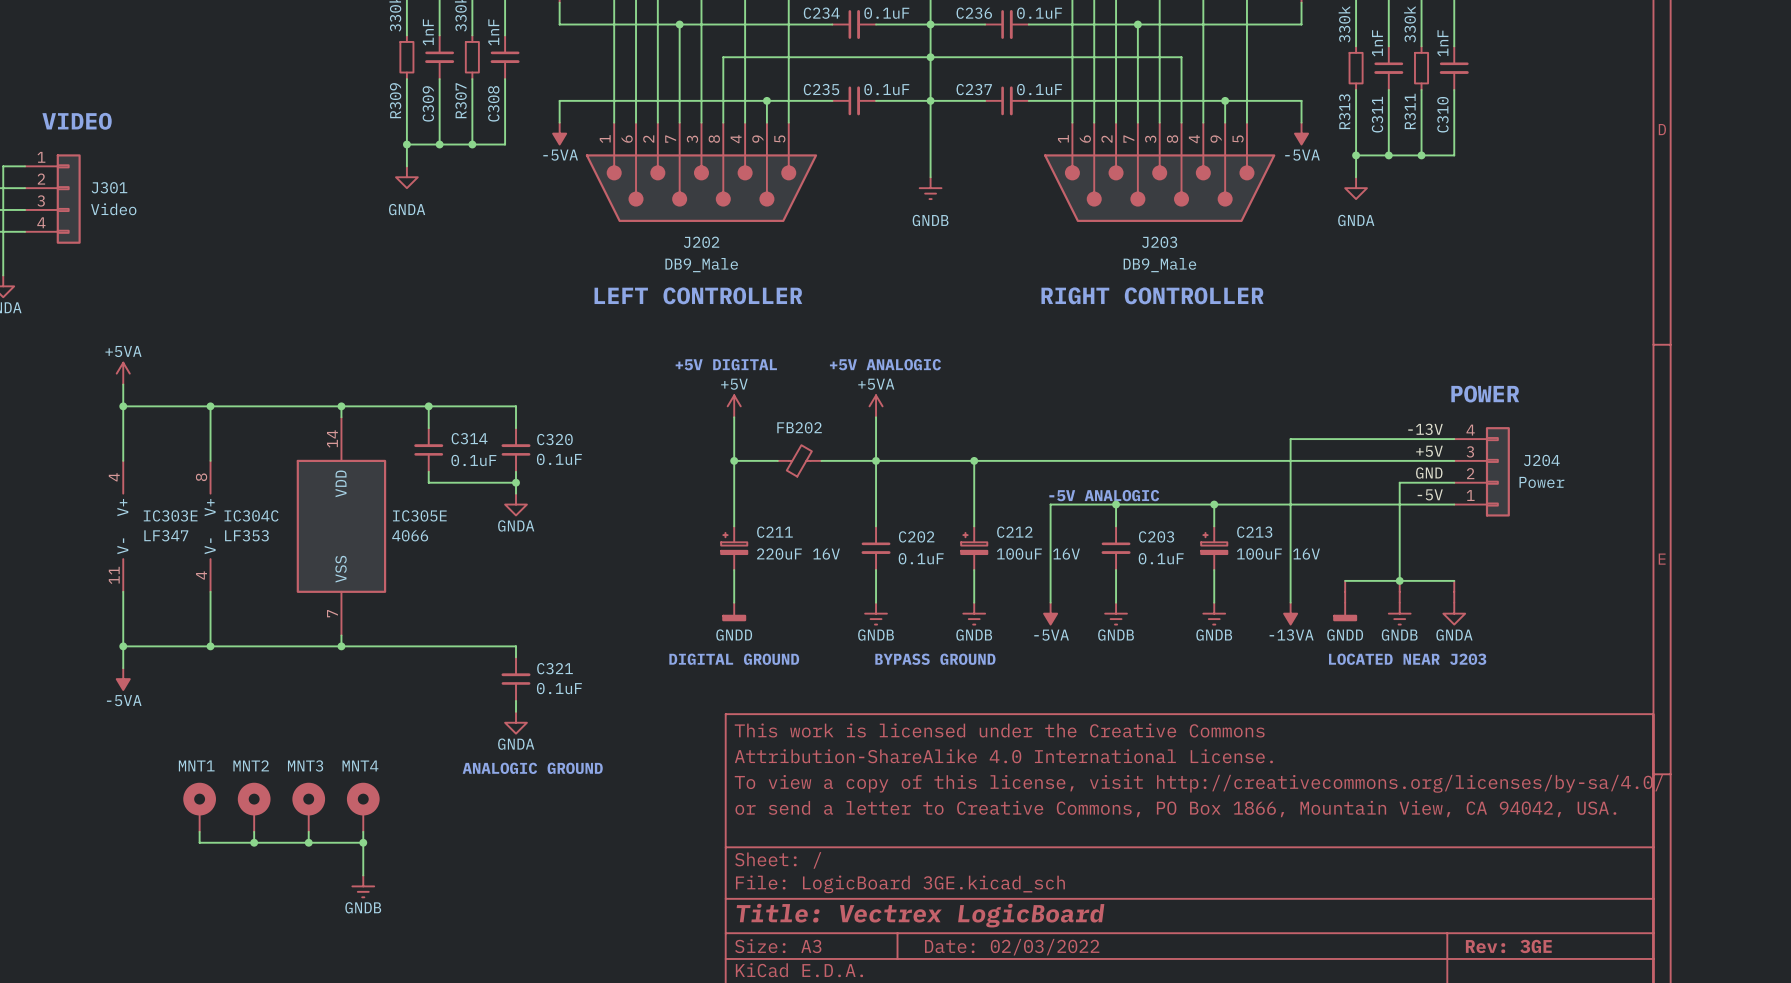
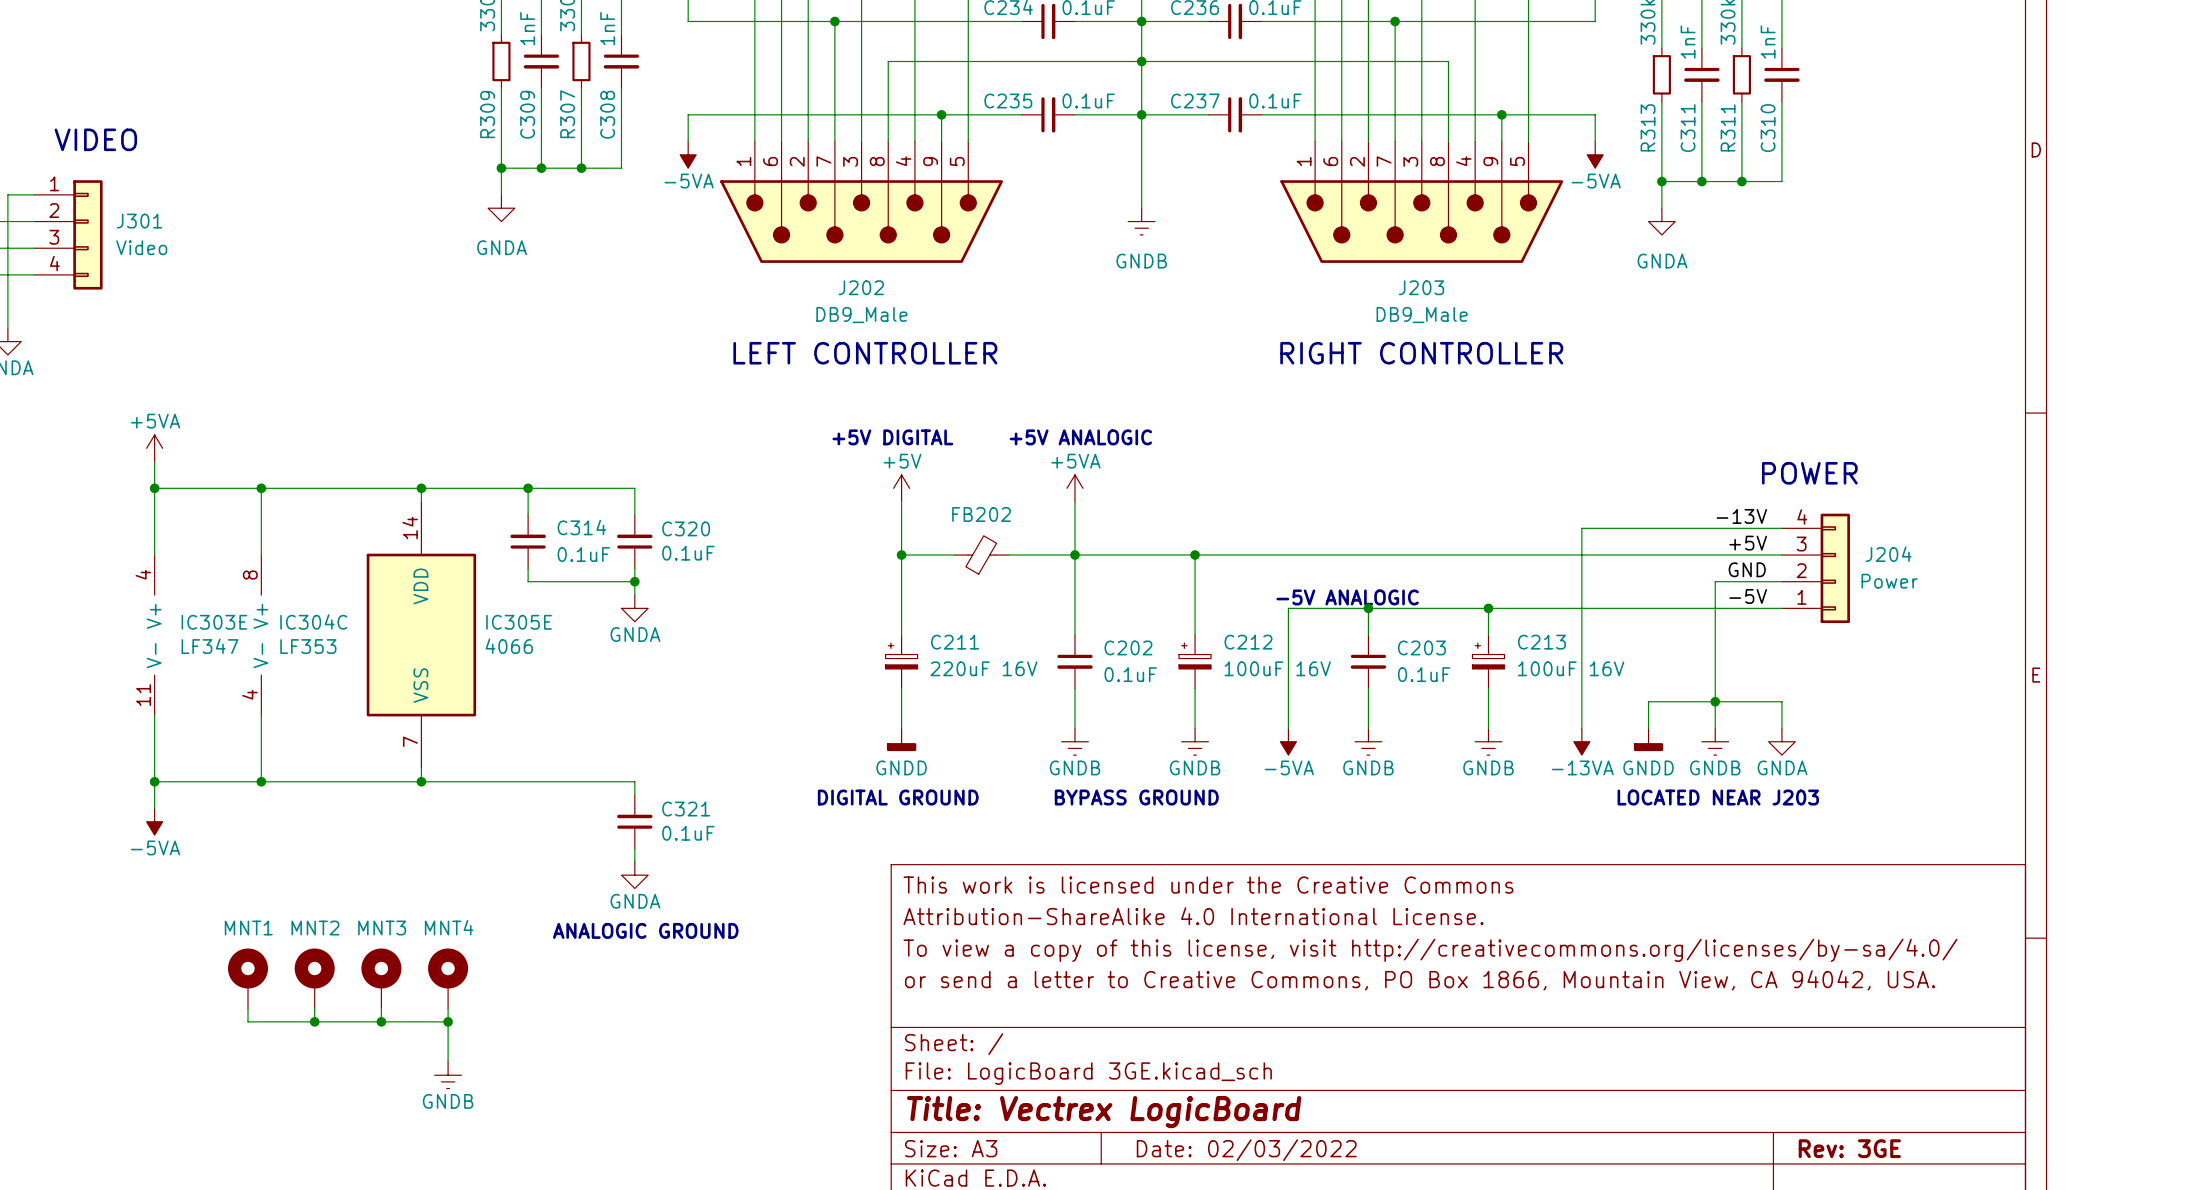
part: (1345, 591) -> none
part: (1399, 591) -> none
part: (1454, 591) -> none

